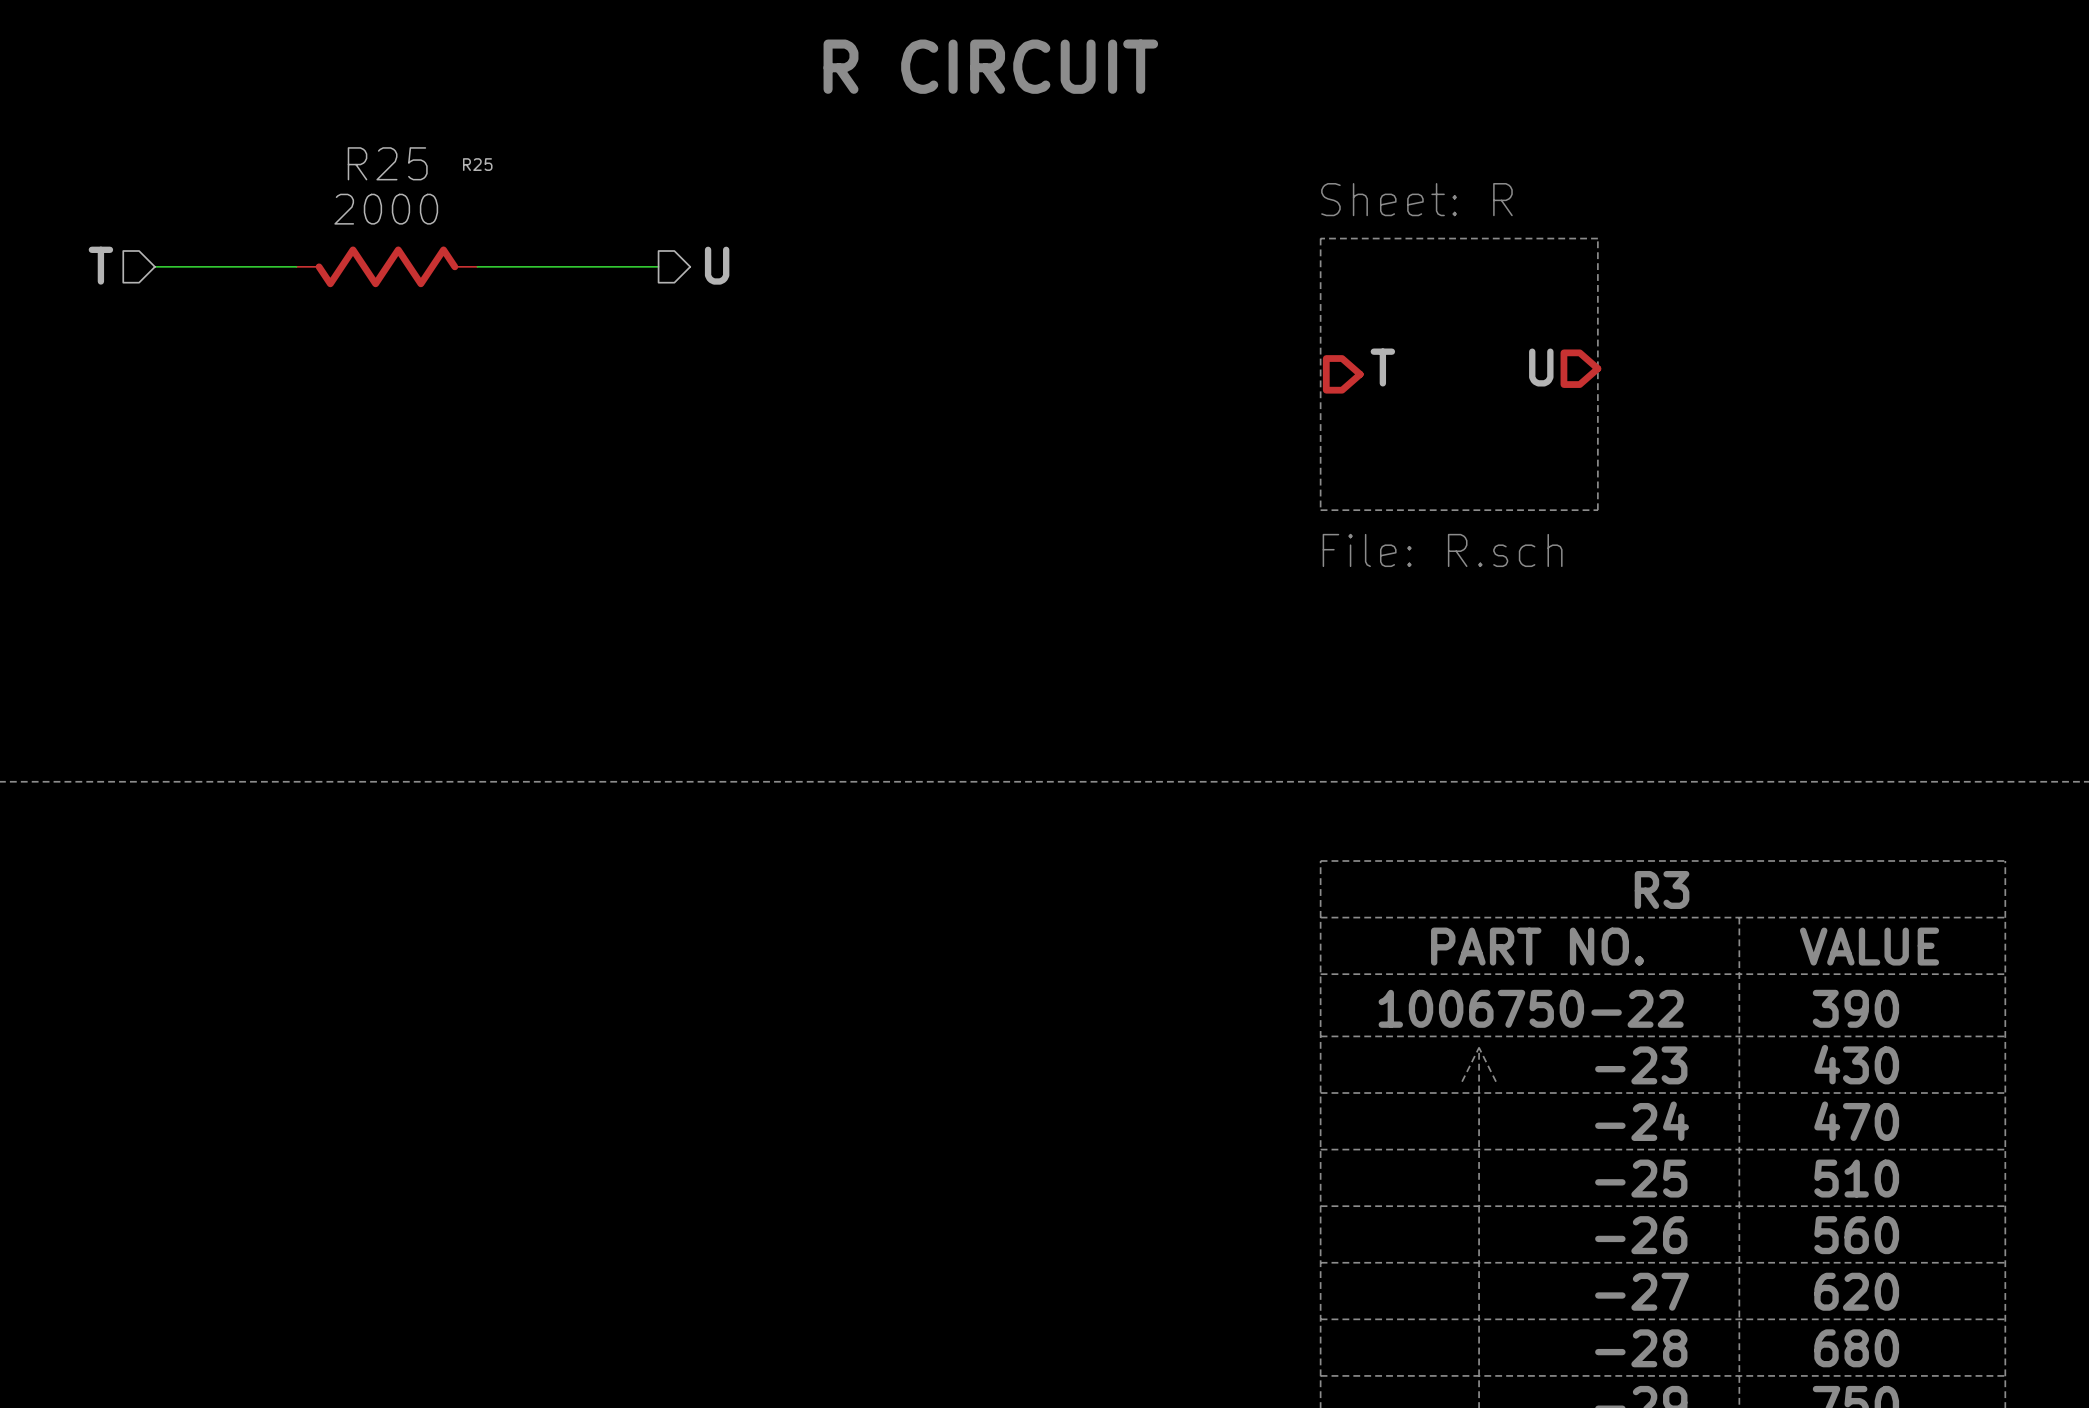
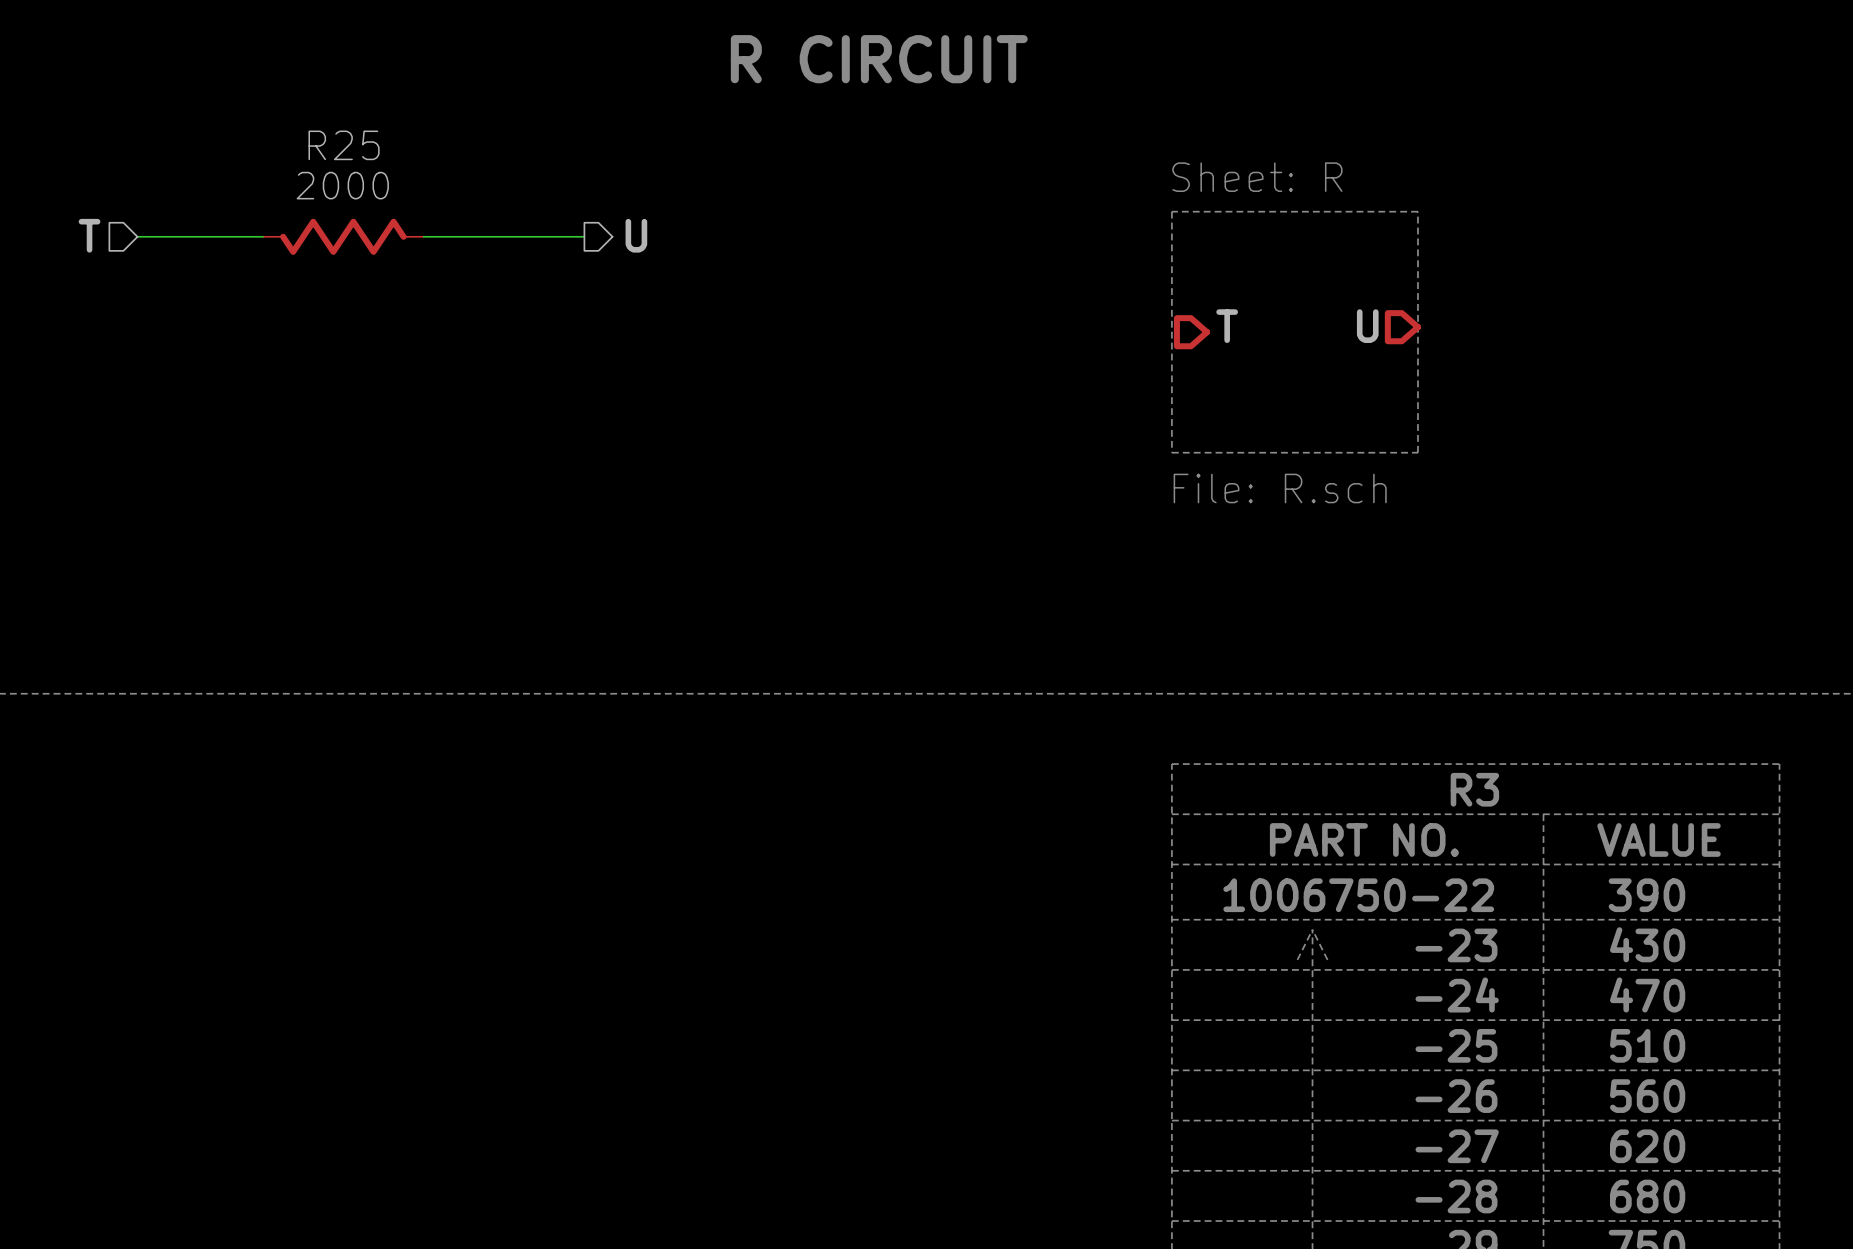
R25 name: R25 (477, 164) -> none

